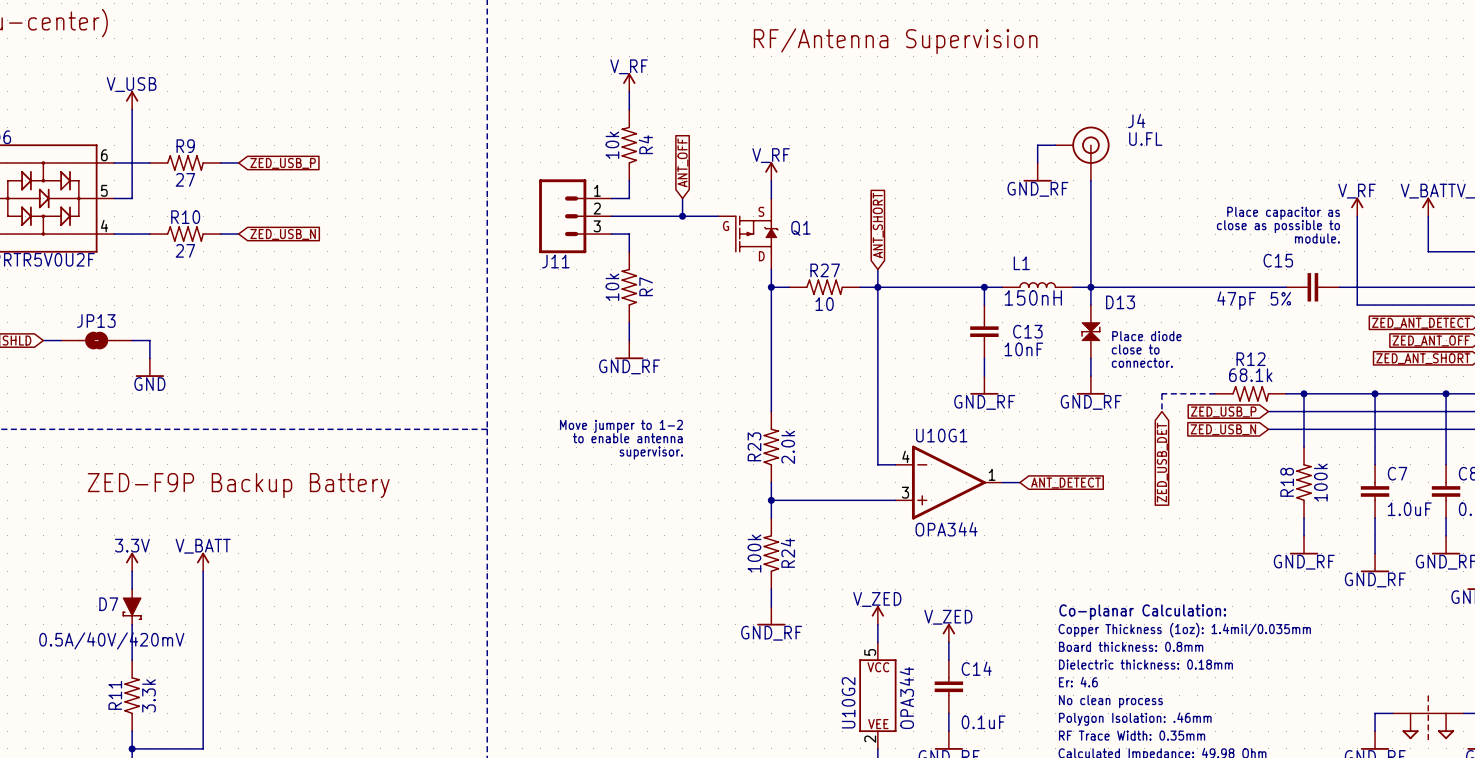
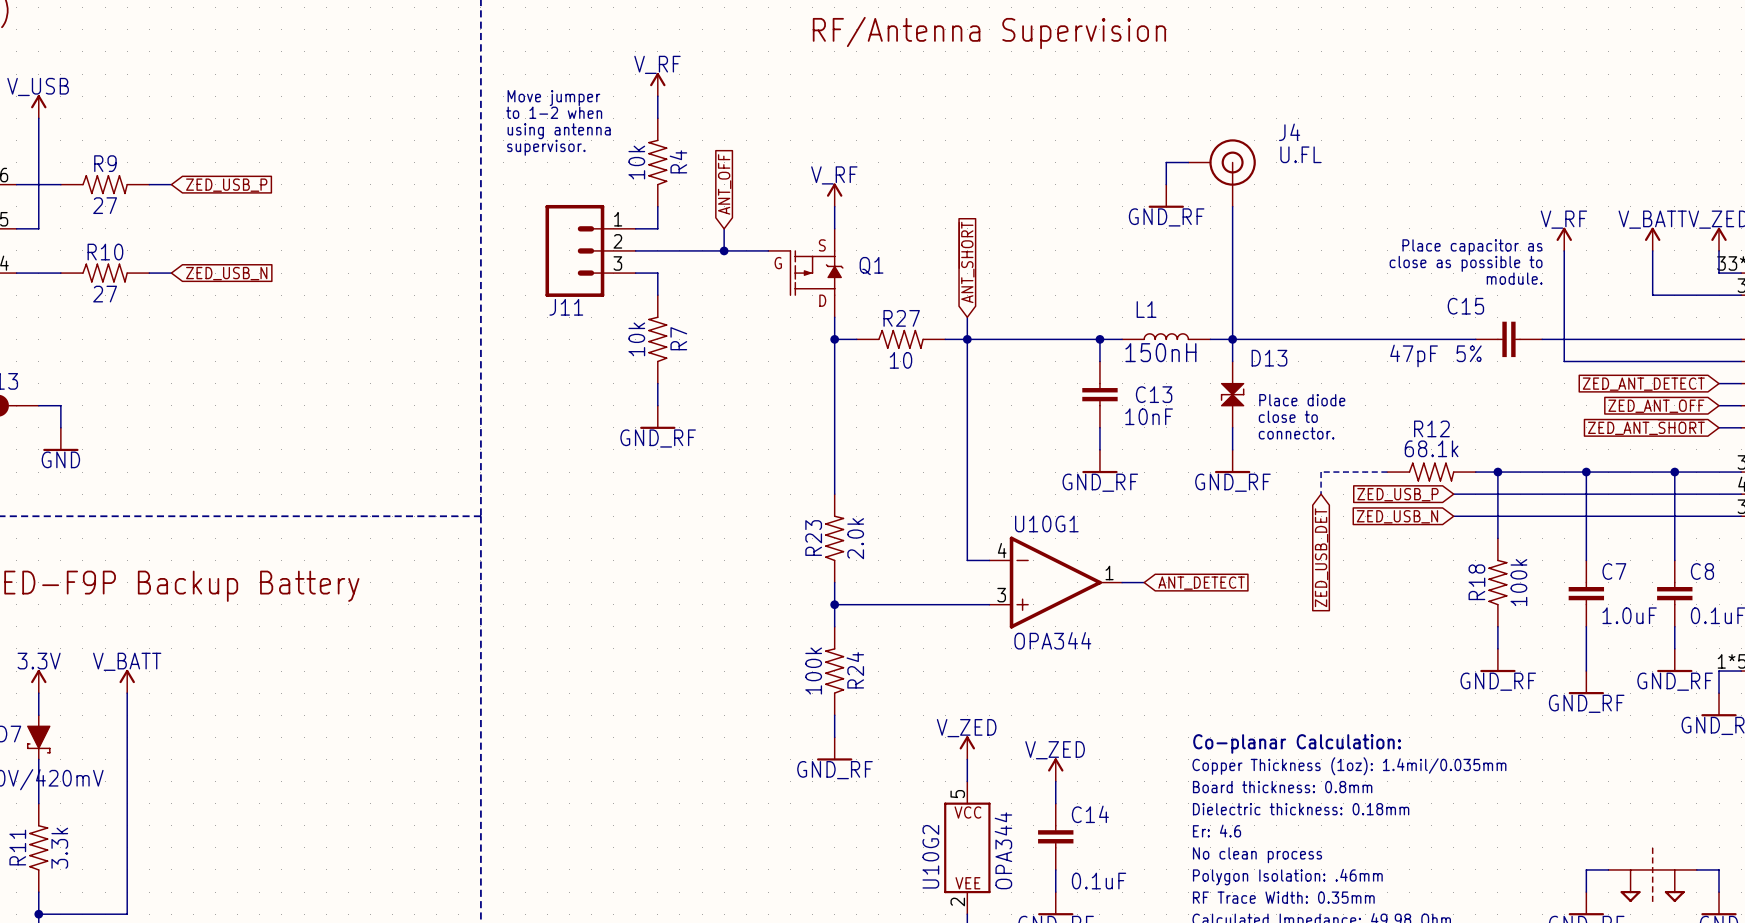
text: none -> Move jumper (553, 98)
text: none -> to 1-2 when (554, 112)
text: none -> using antenna (559, 131)
text: none -> supervisor. (546, 147)
text: Move jumper to 1-2 (621, 426) -> none
text: to enable antenna (627, 438) -> none
text: supervisor. (651, 453) -> none

